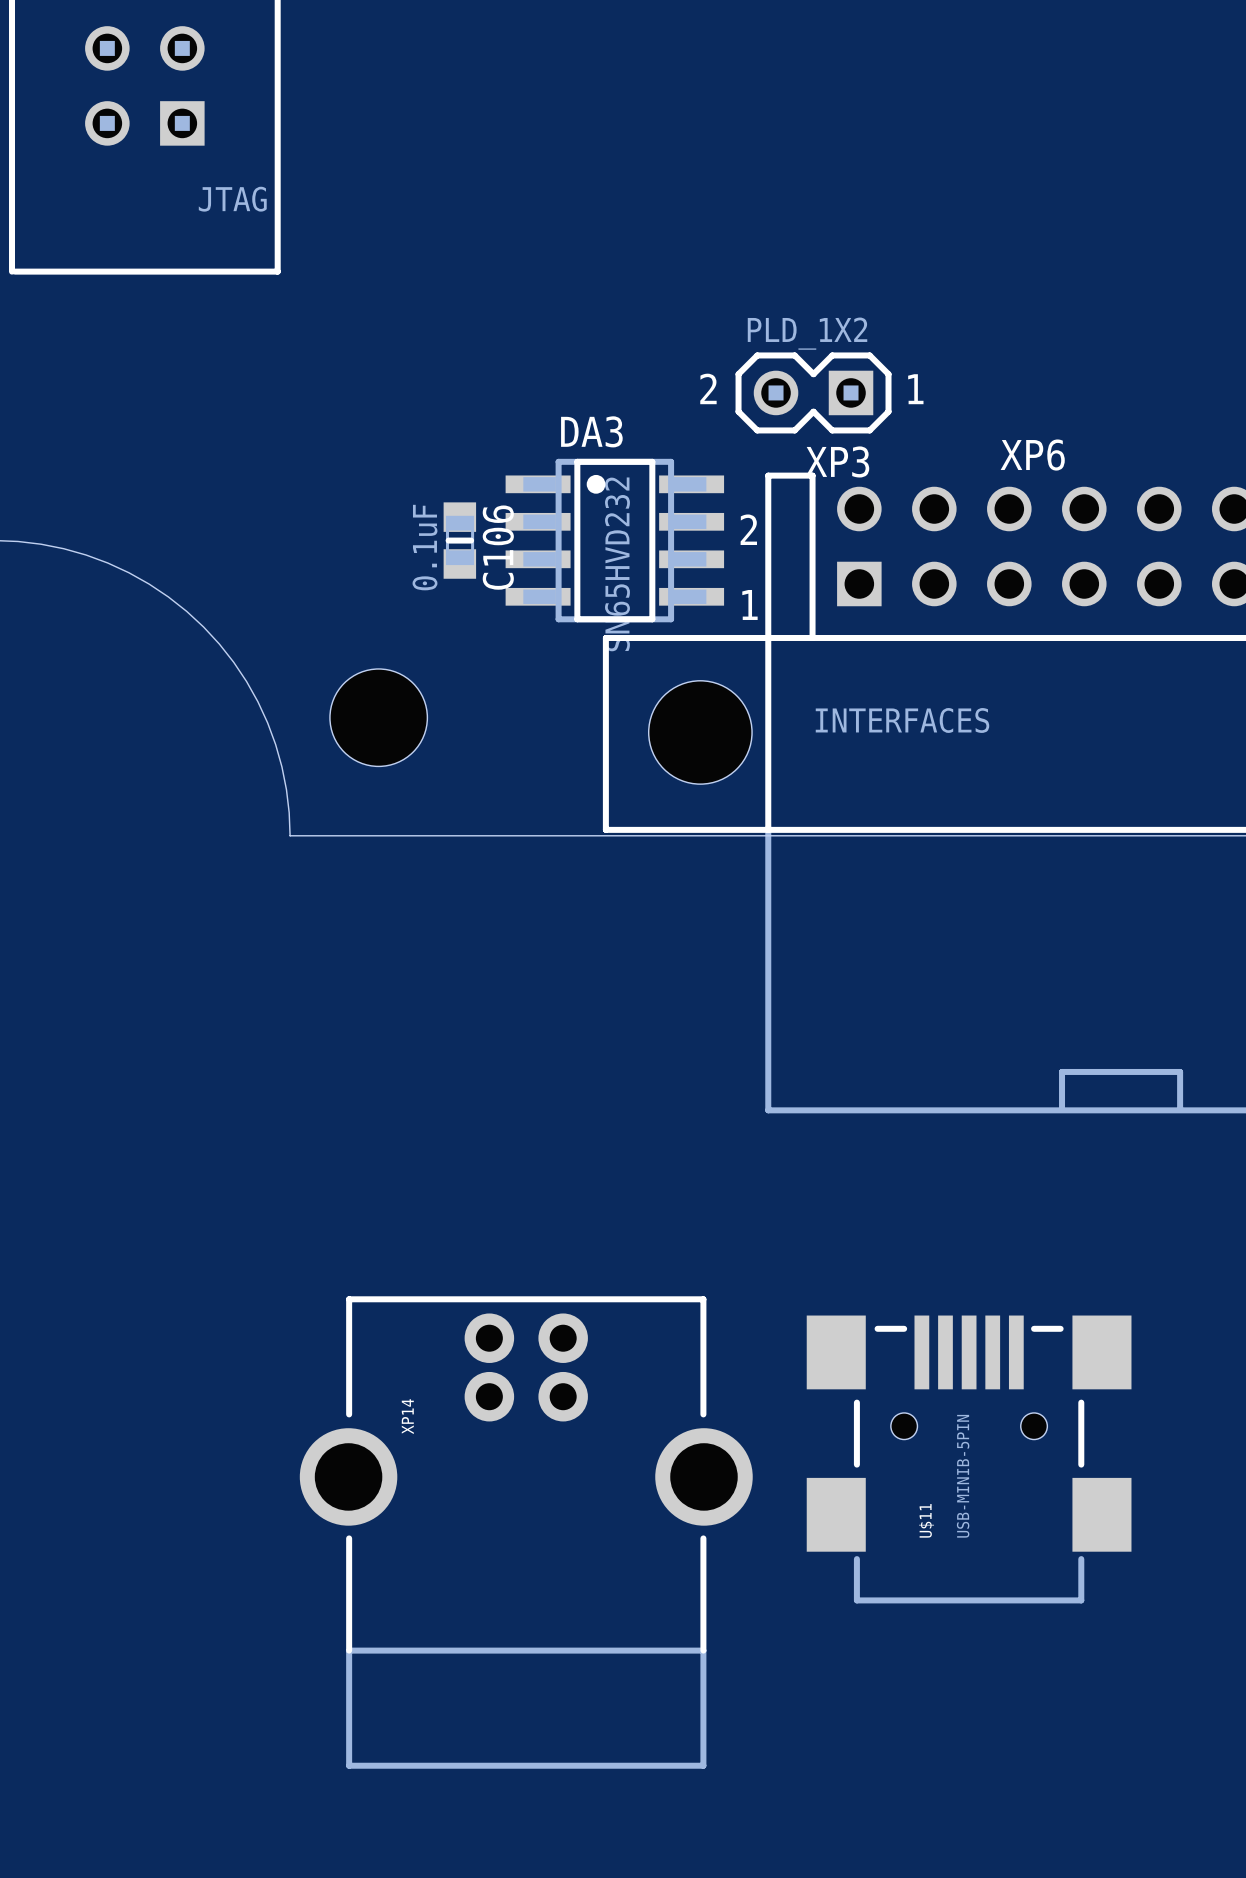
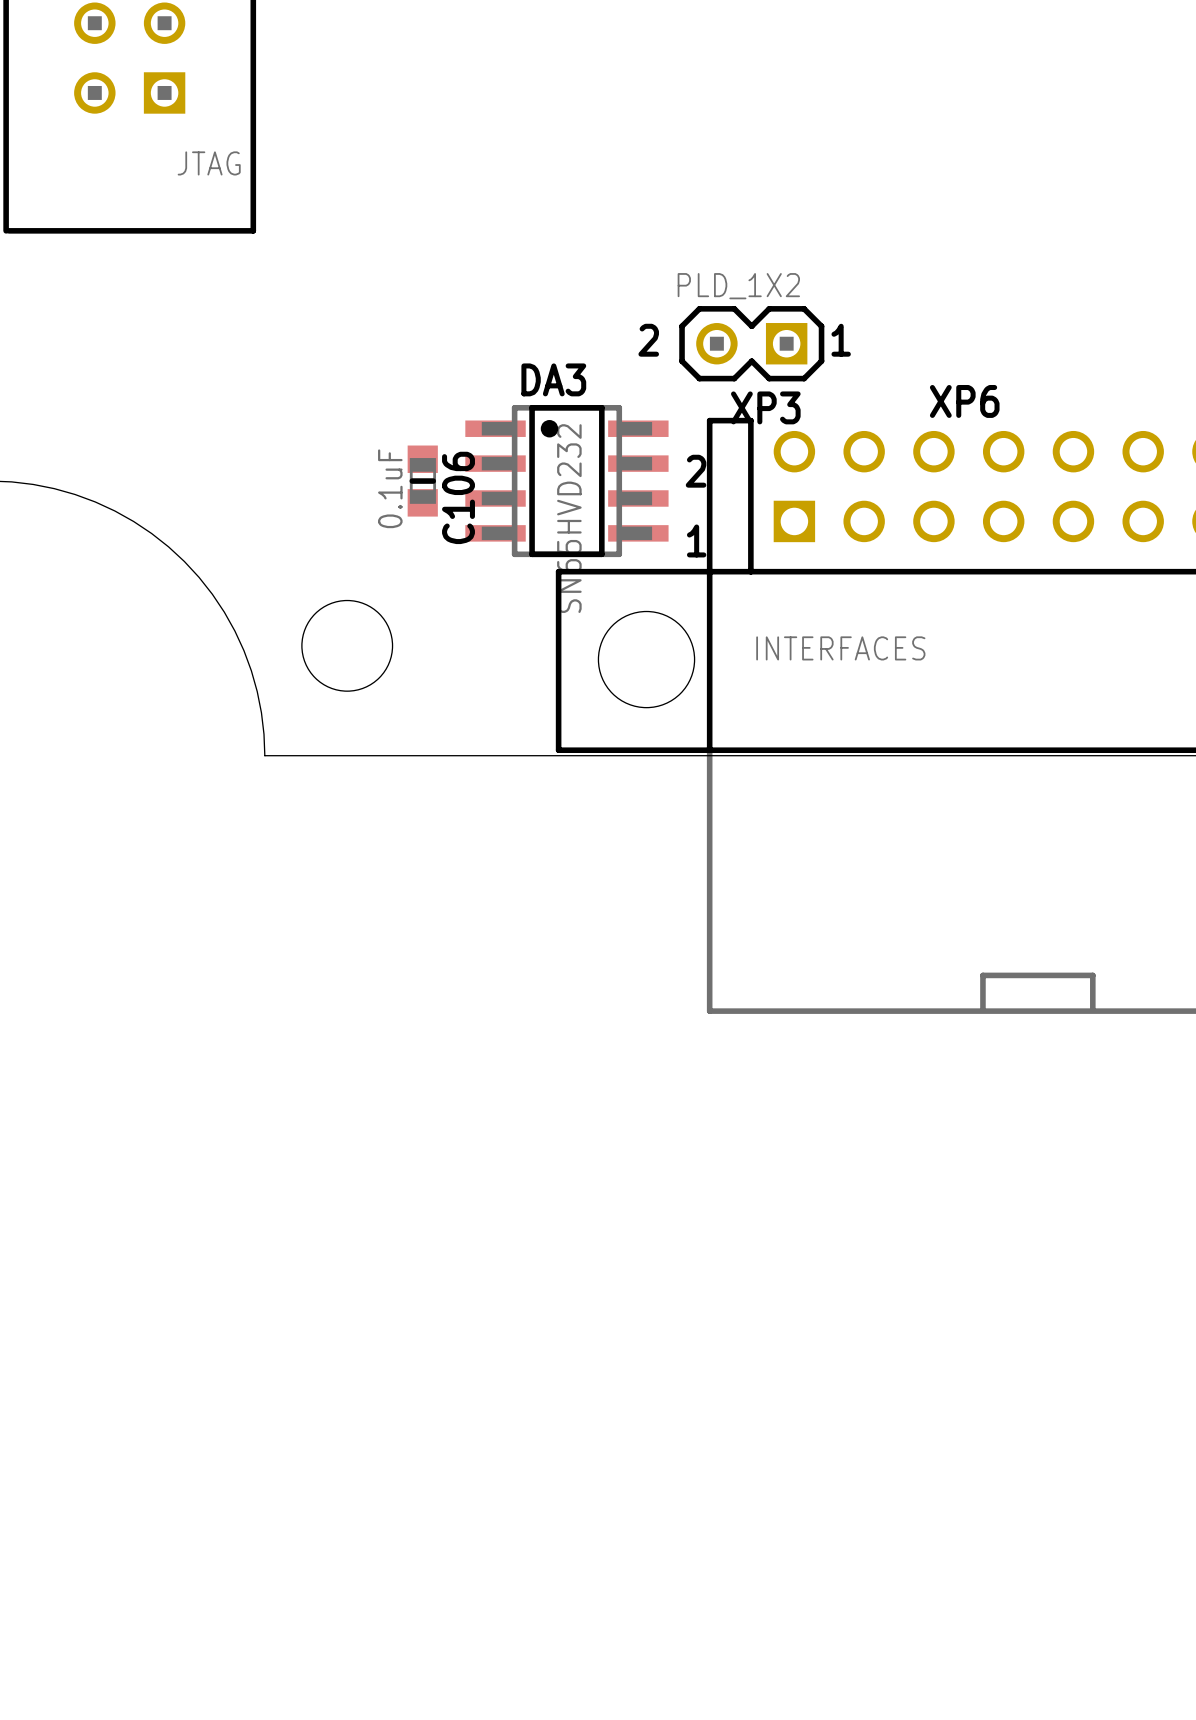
U$11: USB-MINIB-5PIN (969, 1459) -> none
XP14: (526, 1532) -> none

